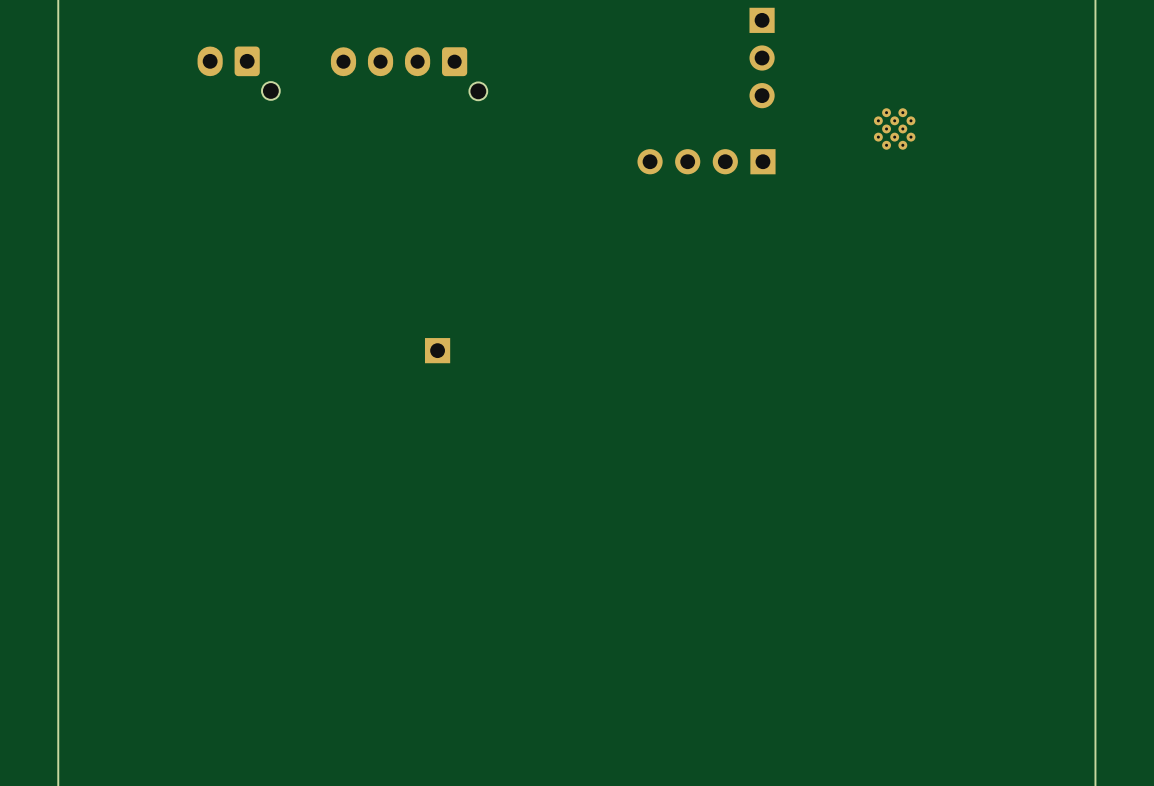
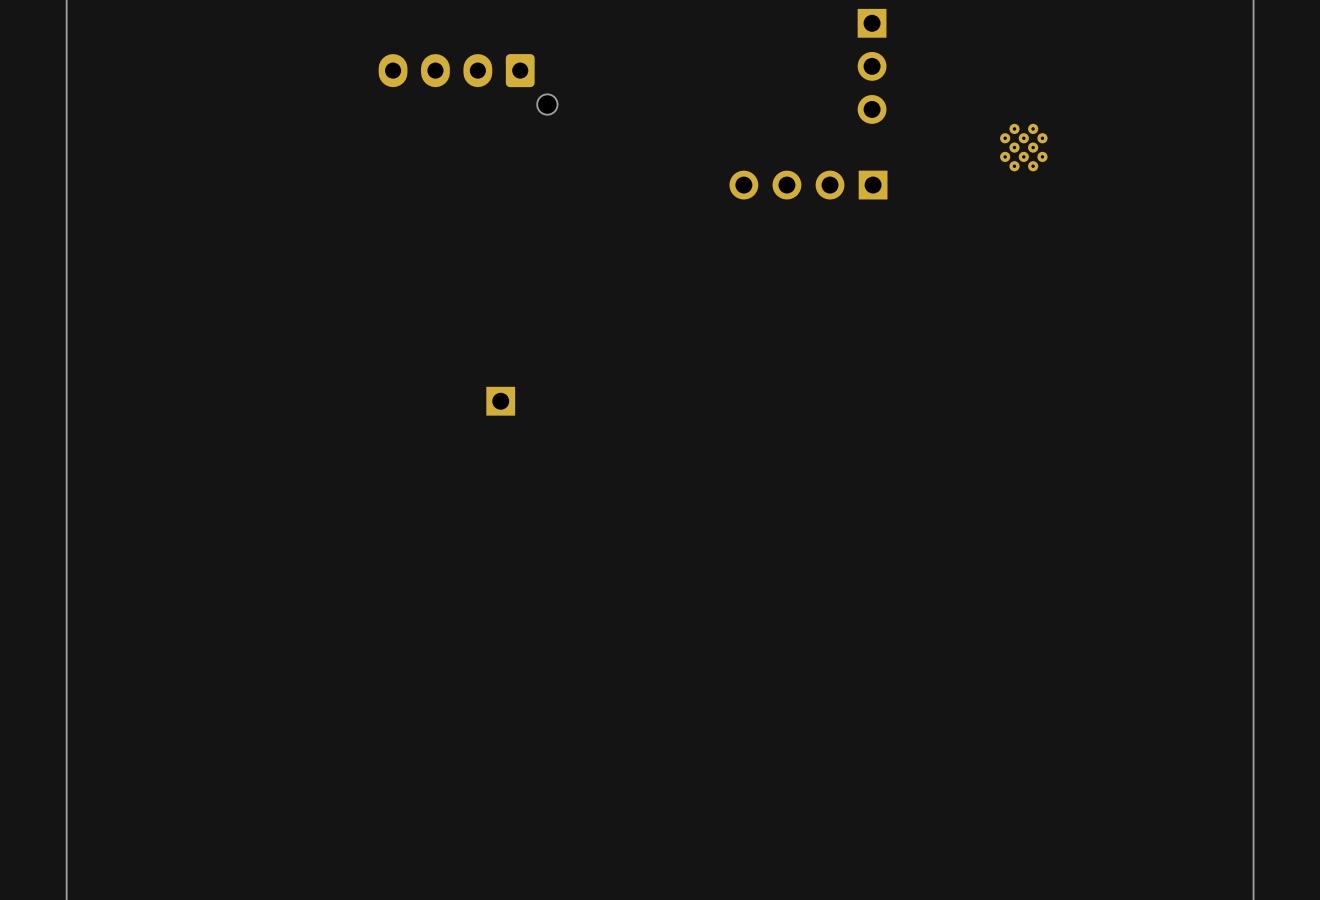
part: (238, 73) -> none

